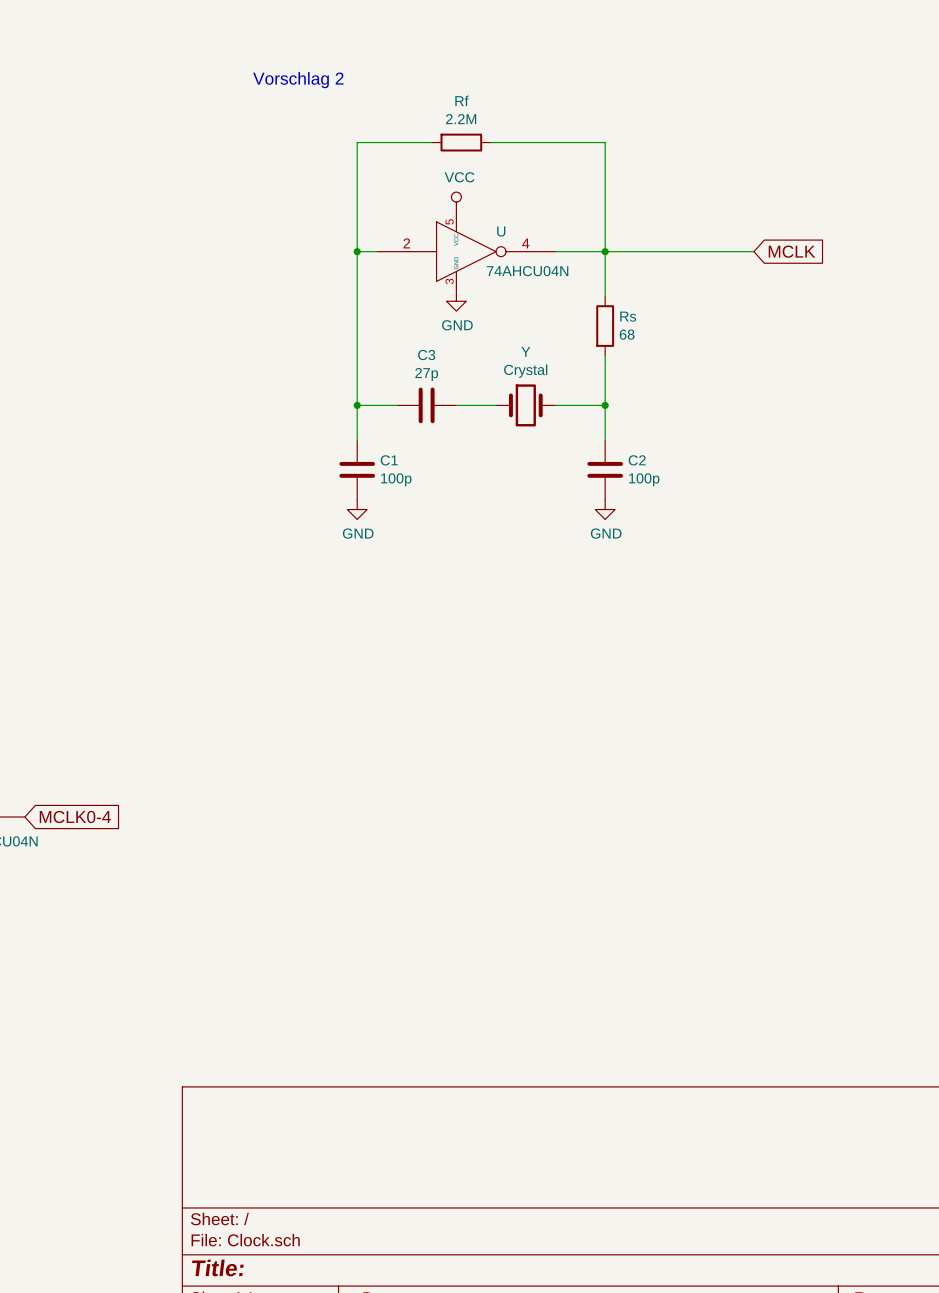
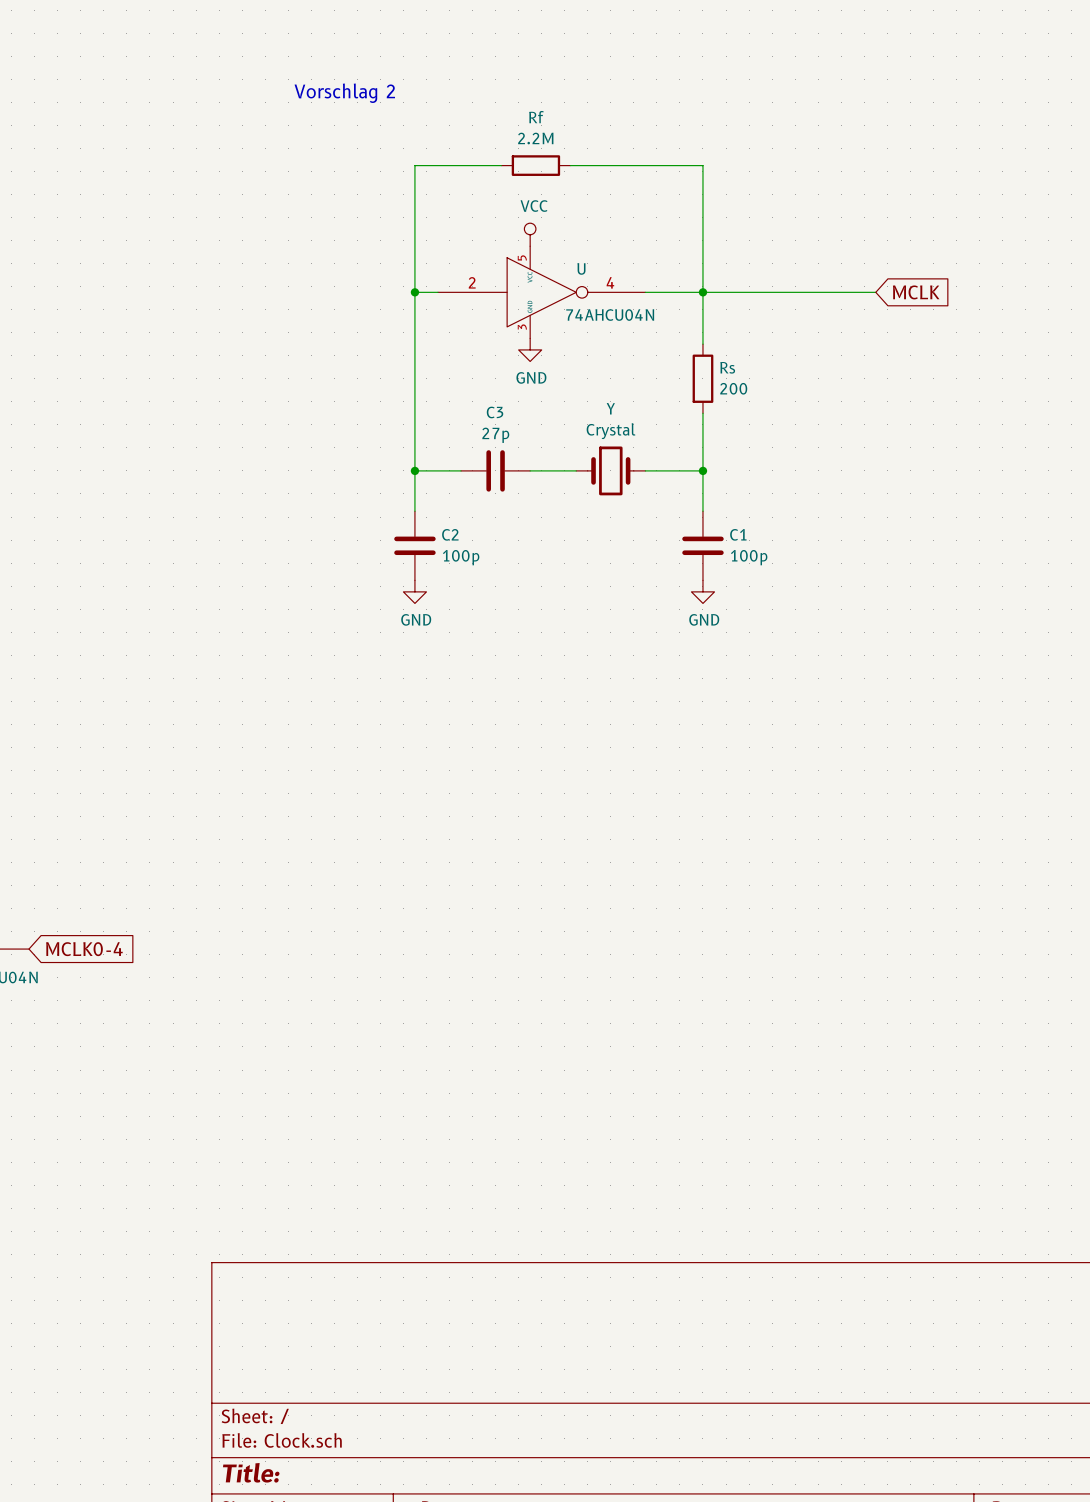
Rs value: 68 (627, 334) -> 200 (733, 388)
C1 name: C1 (389, 460) -> C2 (450, 534)
C2 name: C2 (637, 460) -> C1 (738, 534)

